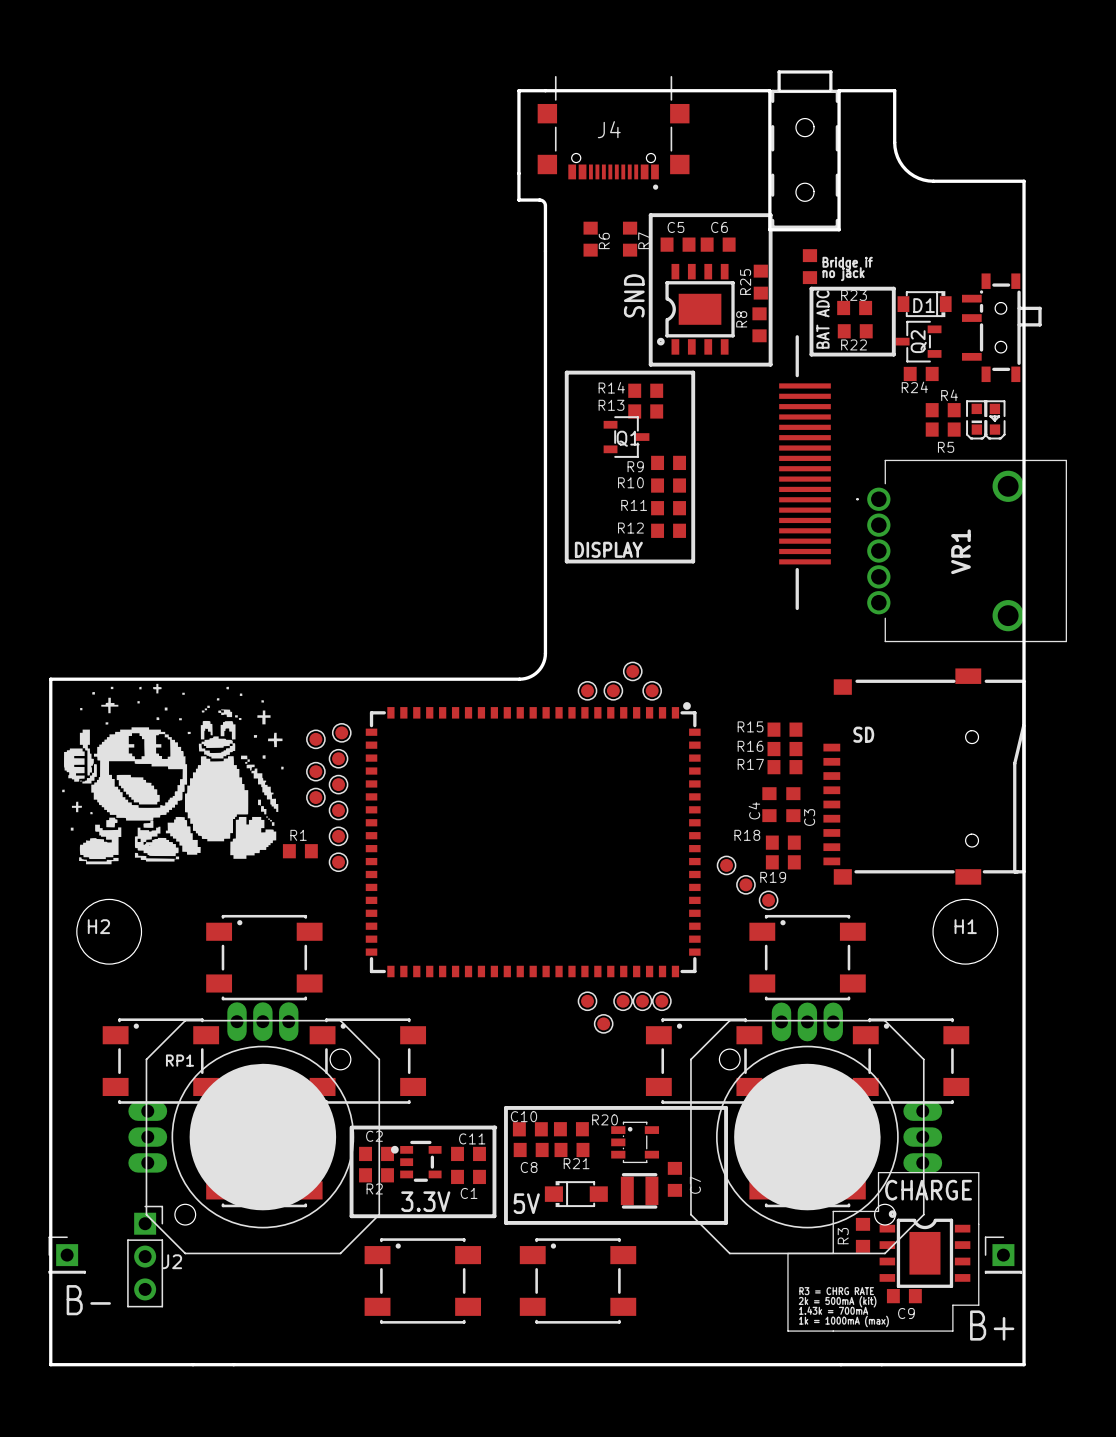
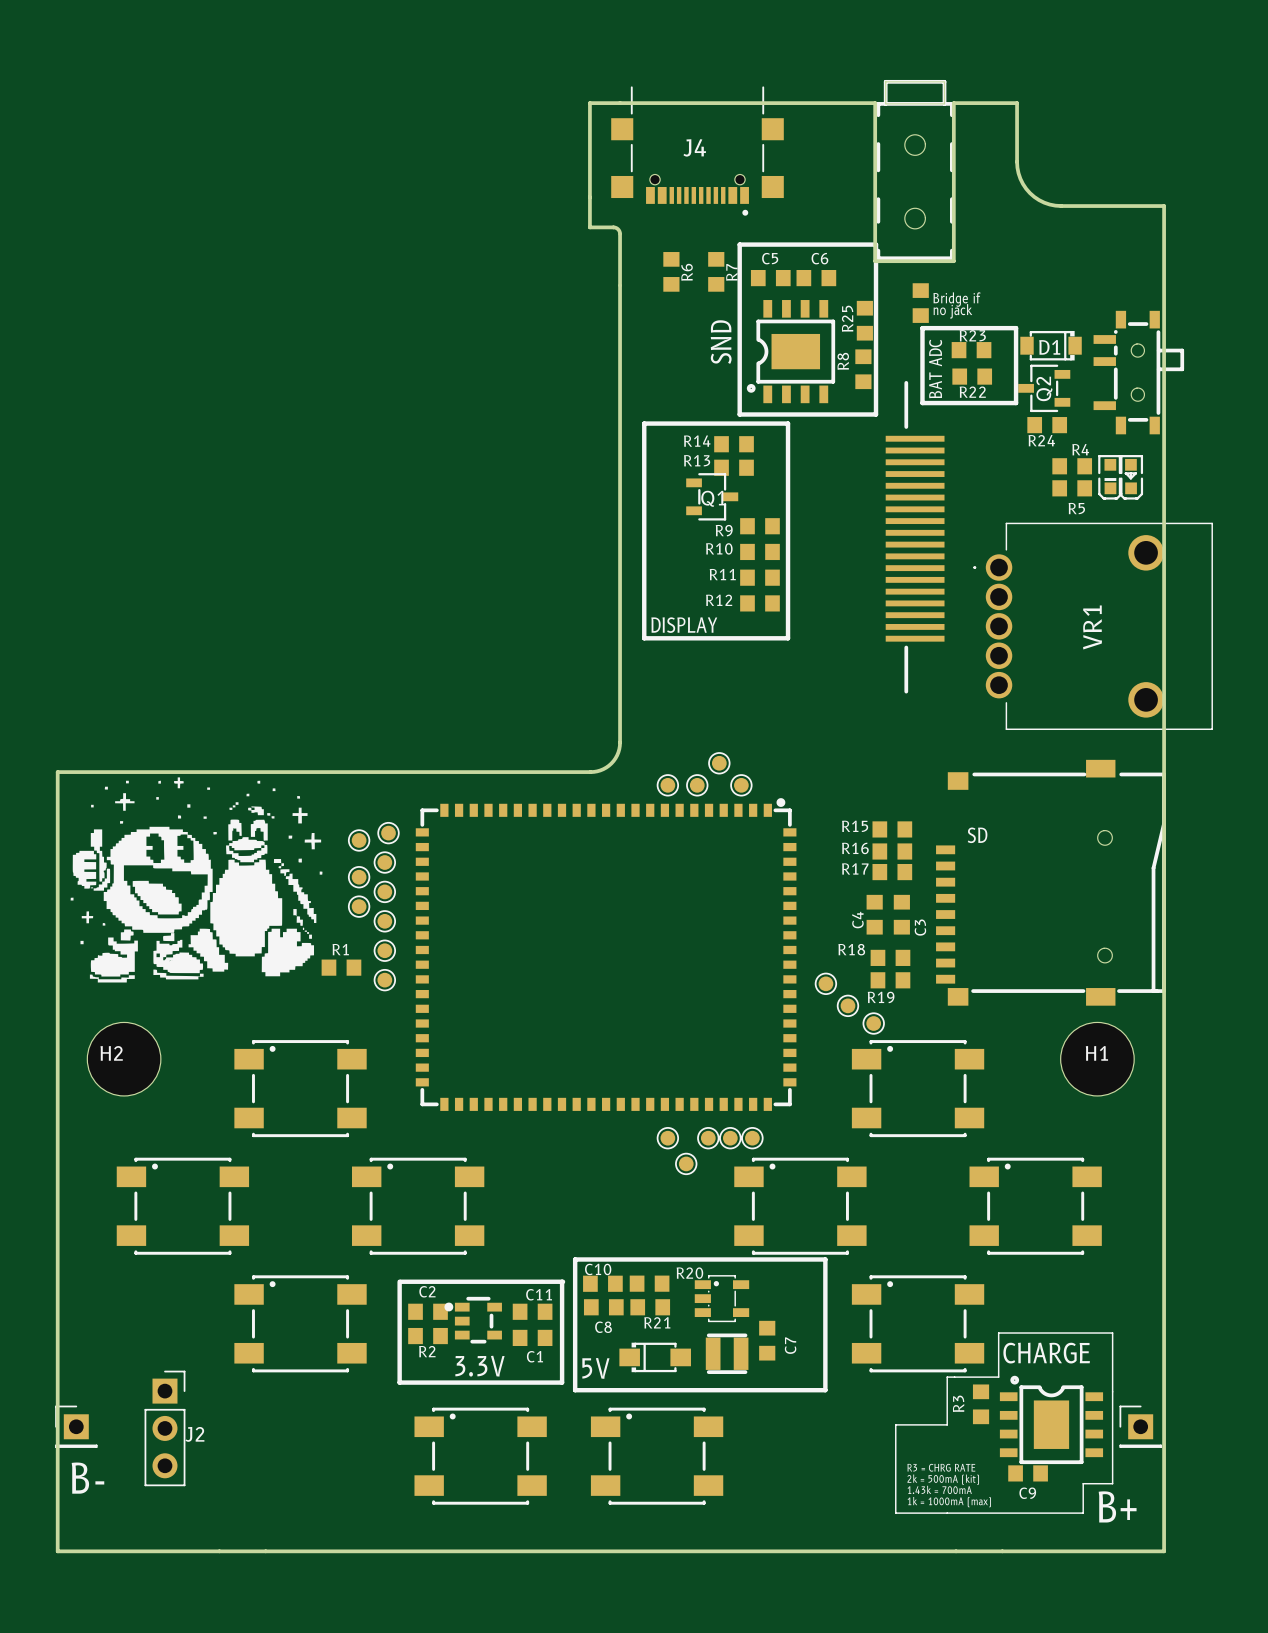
RP1: (254, 1128) -> none
part: (816, 1128) -> none

